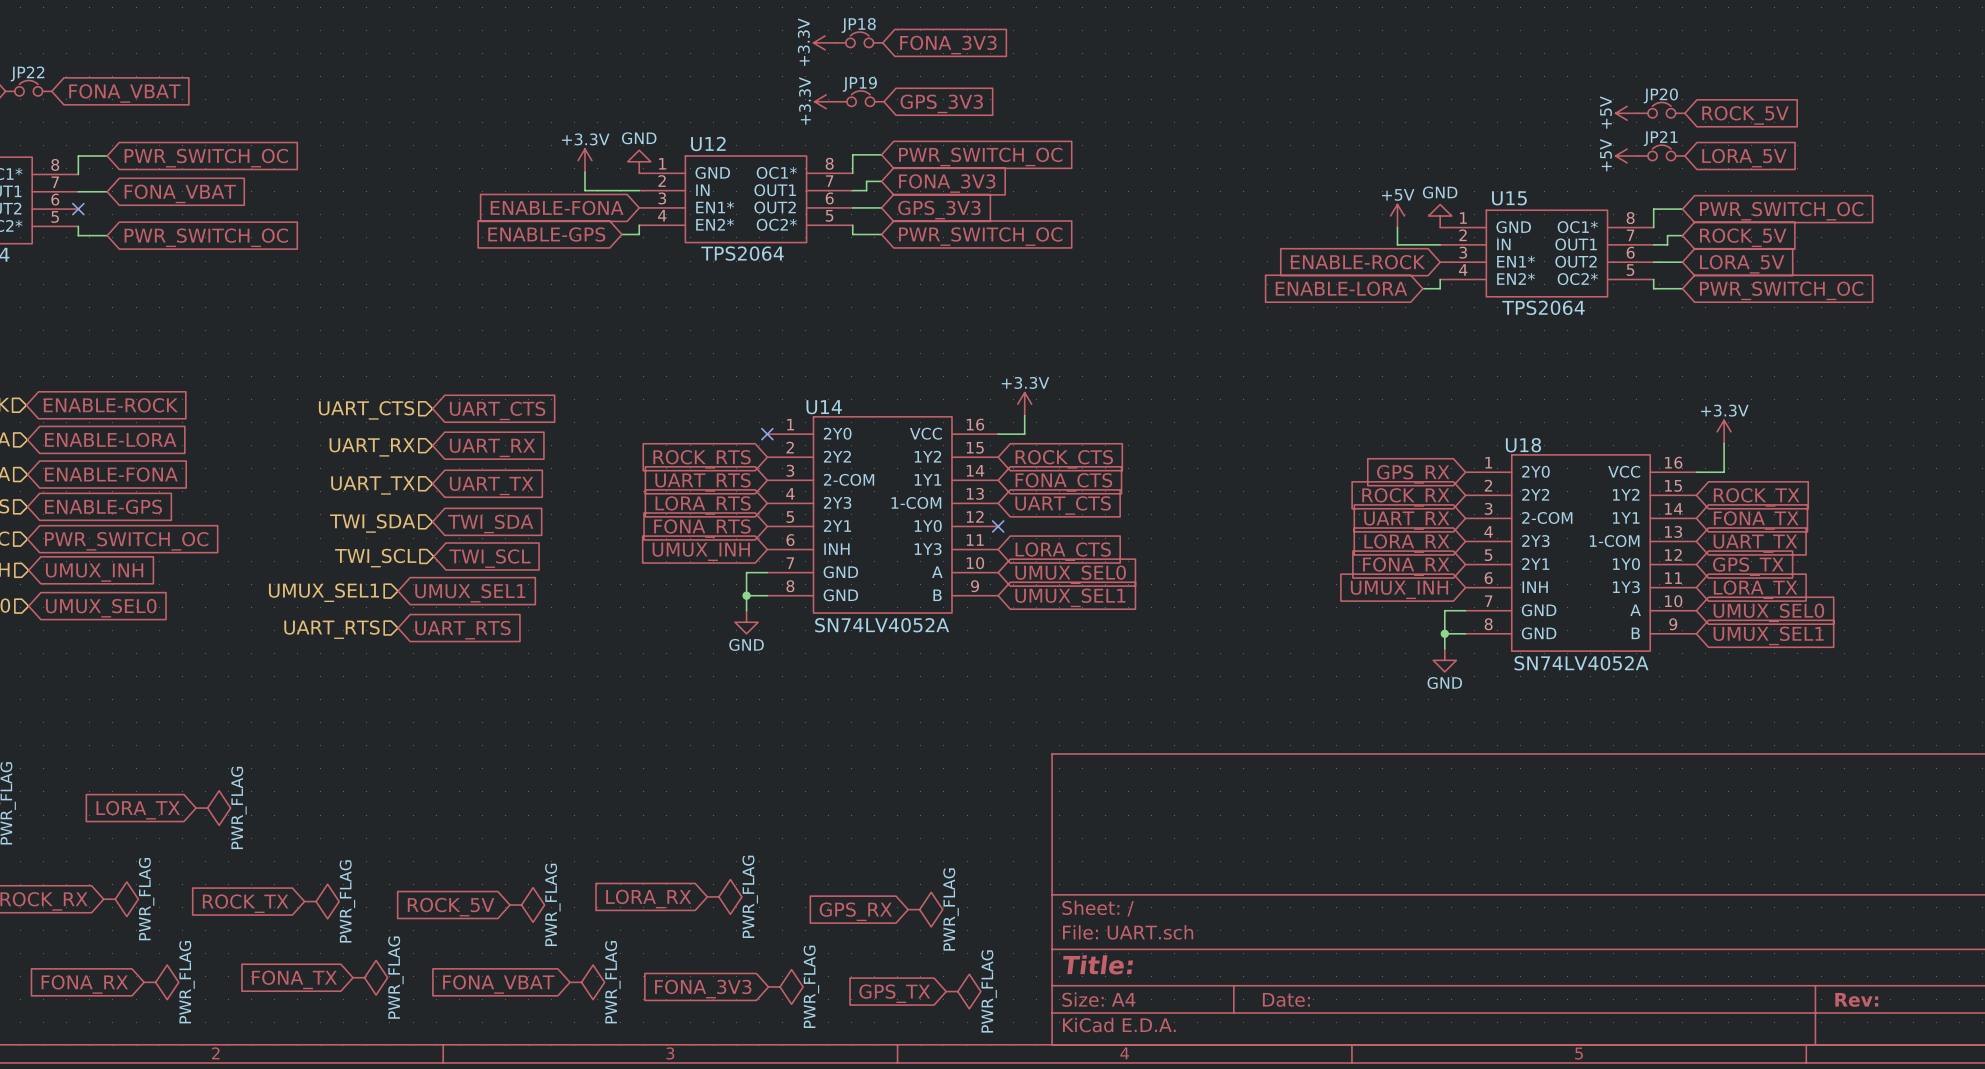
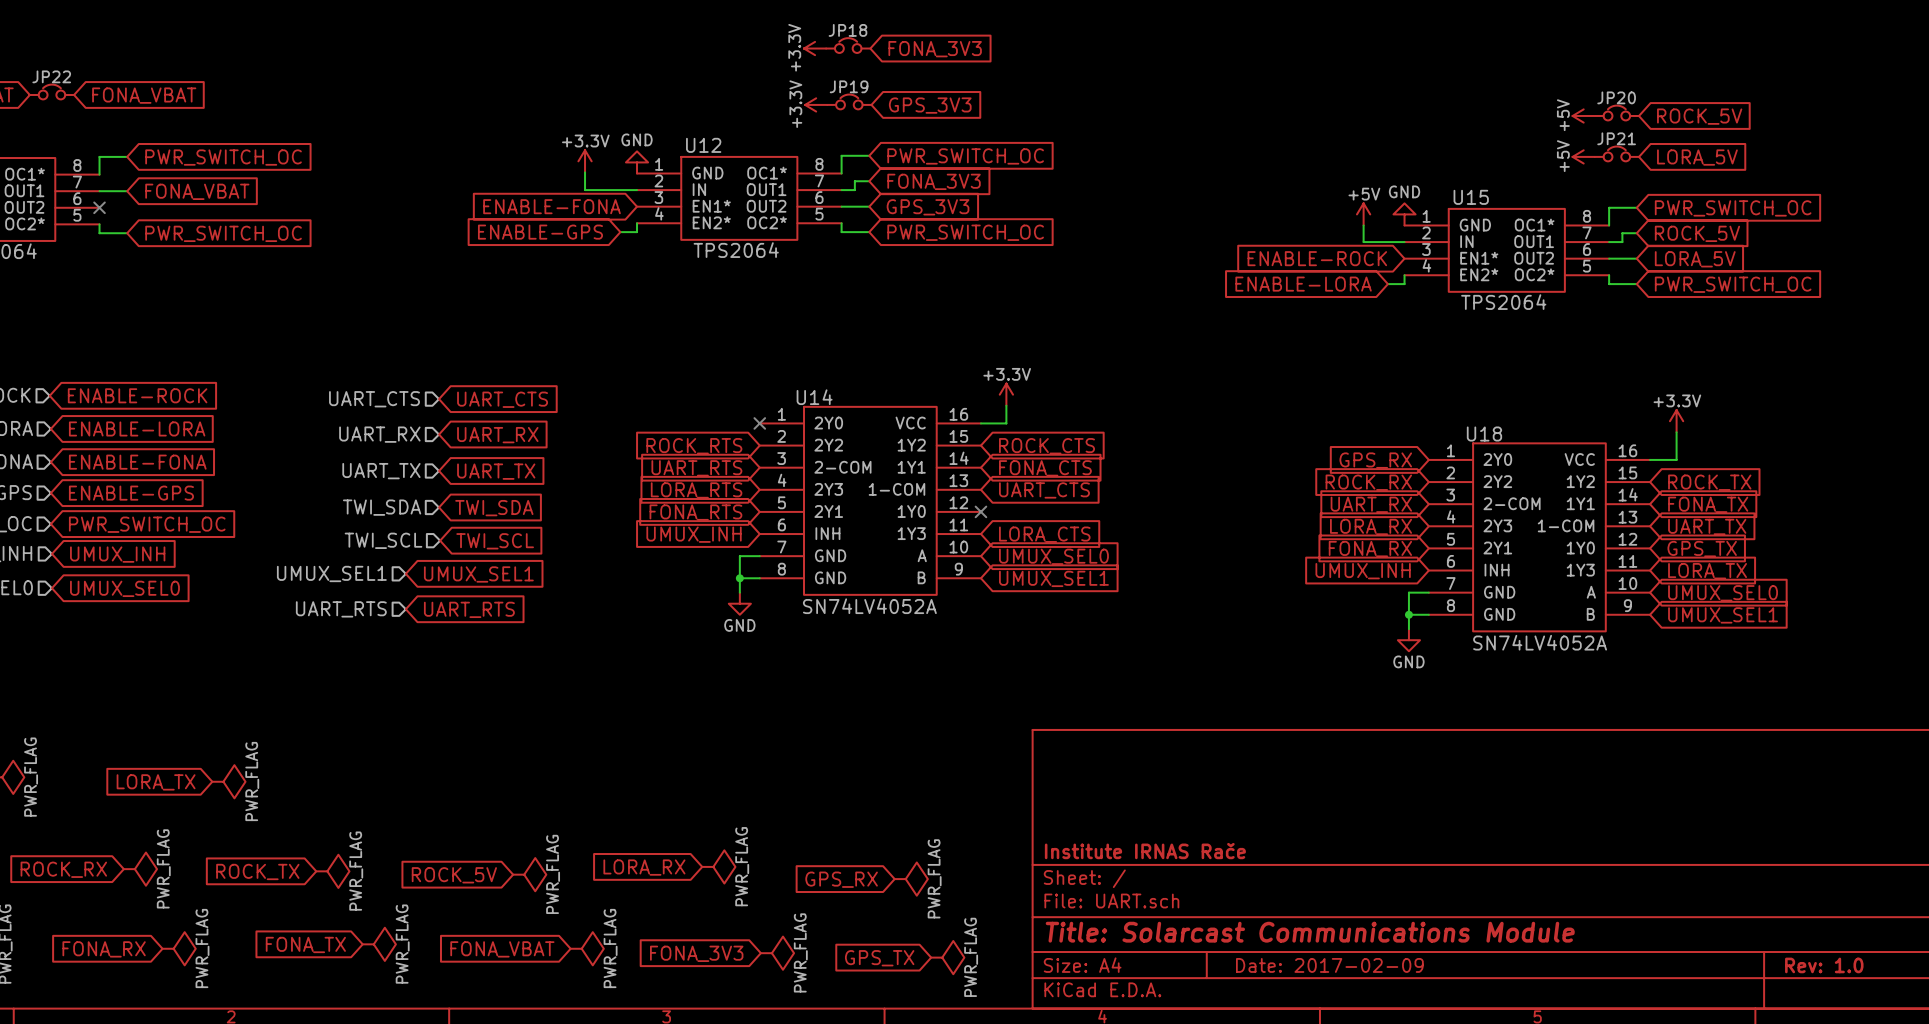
title block: none -> Institute IRNAS Rače (1145, 851)
title block: Title: (1098, 964) -> Title: Solarcast Communications Module (1310, 932)
title block: Date: (1286, 999) -> Date: 2017-02-09 (1329, 965)
title block: Rev: (1856, 999) -> Rev: 1.0 (1824, 965)

